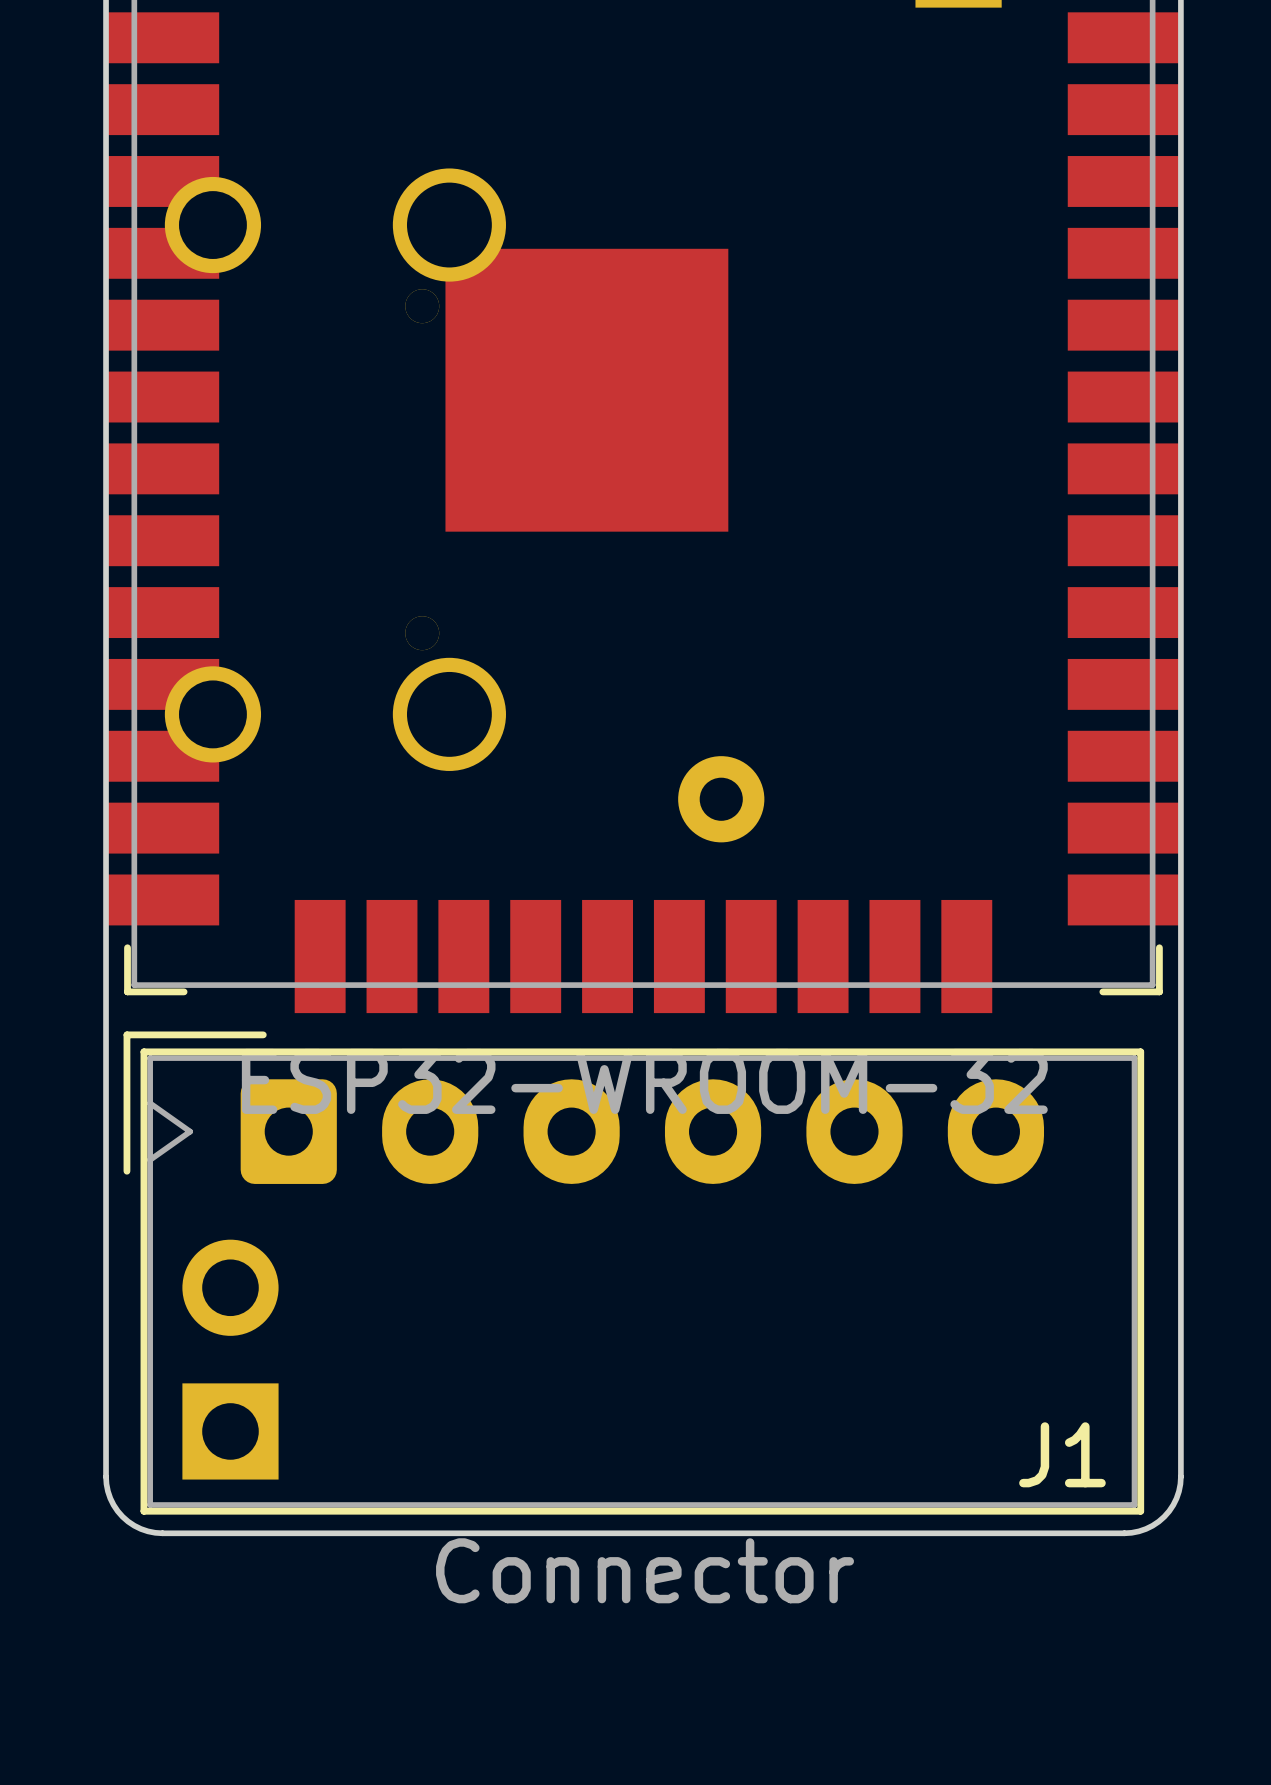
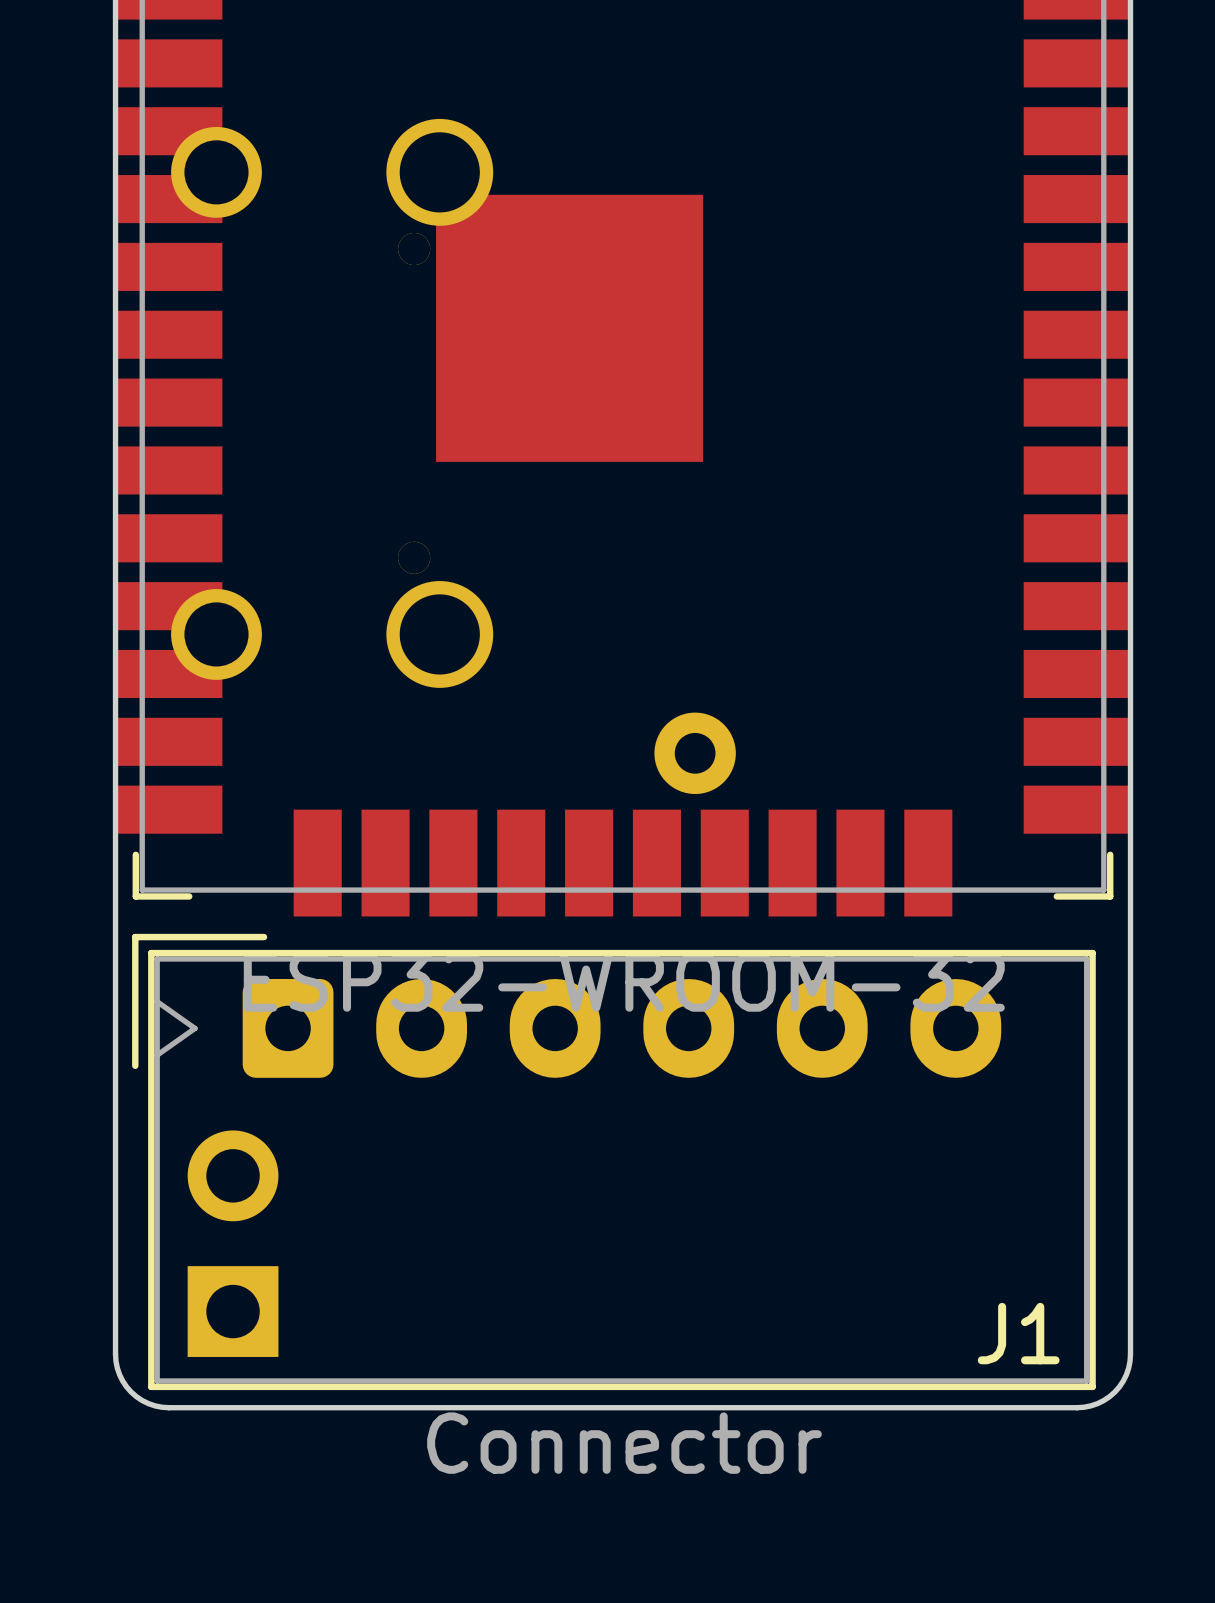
part position: (721, 799) -> (695, 753)

